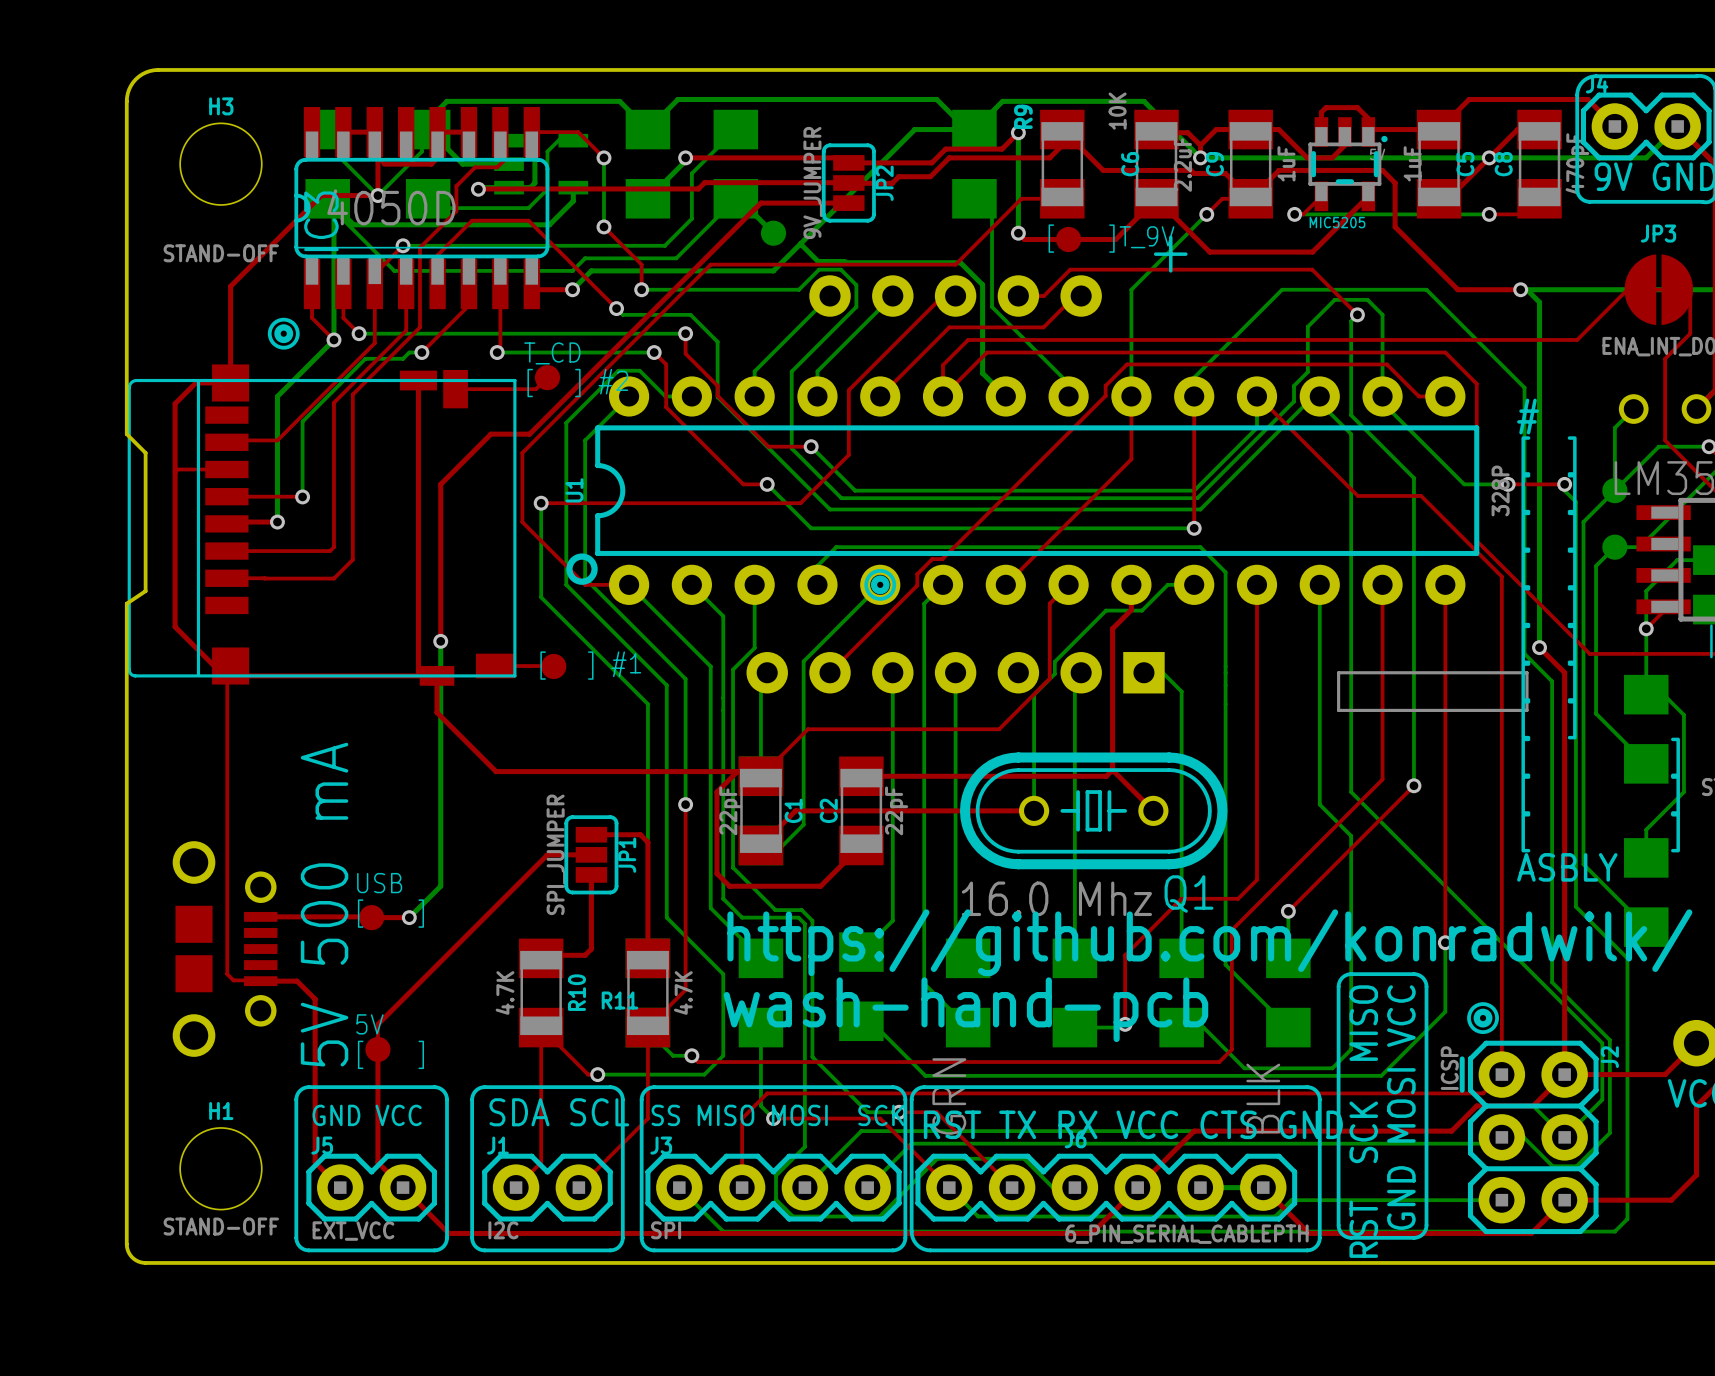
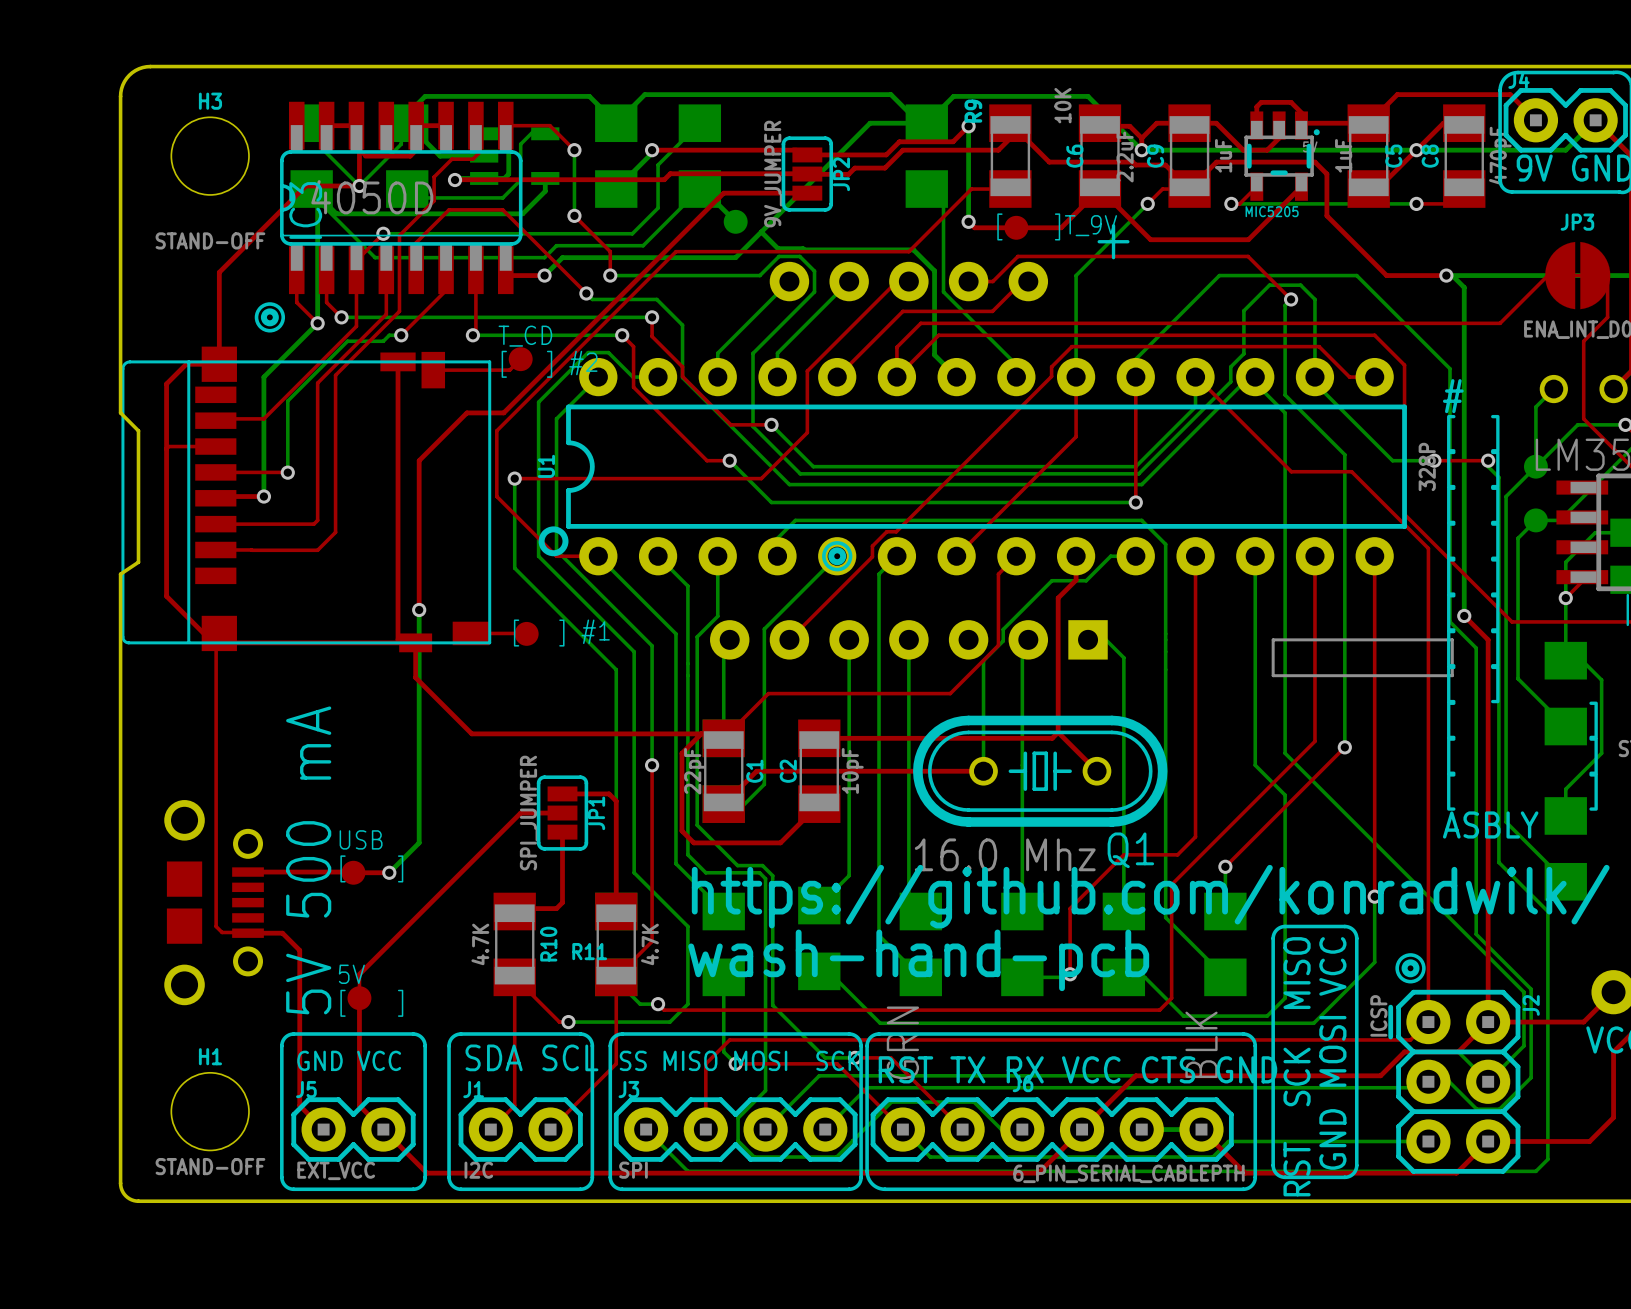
C2 value: 22pF (896, 810) -> 10pF (852, 770)

